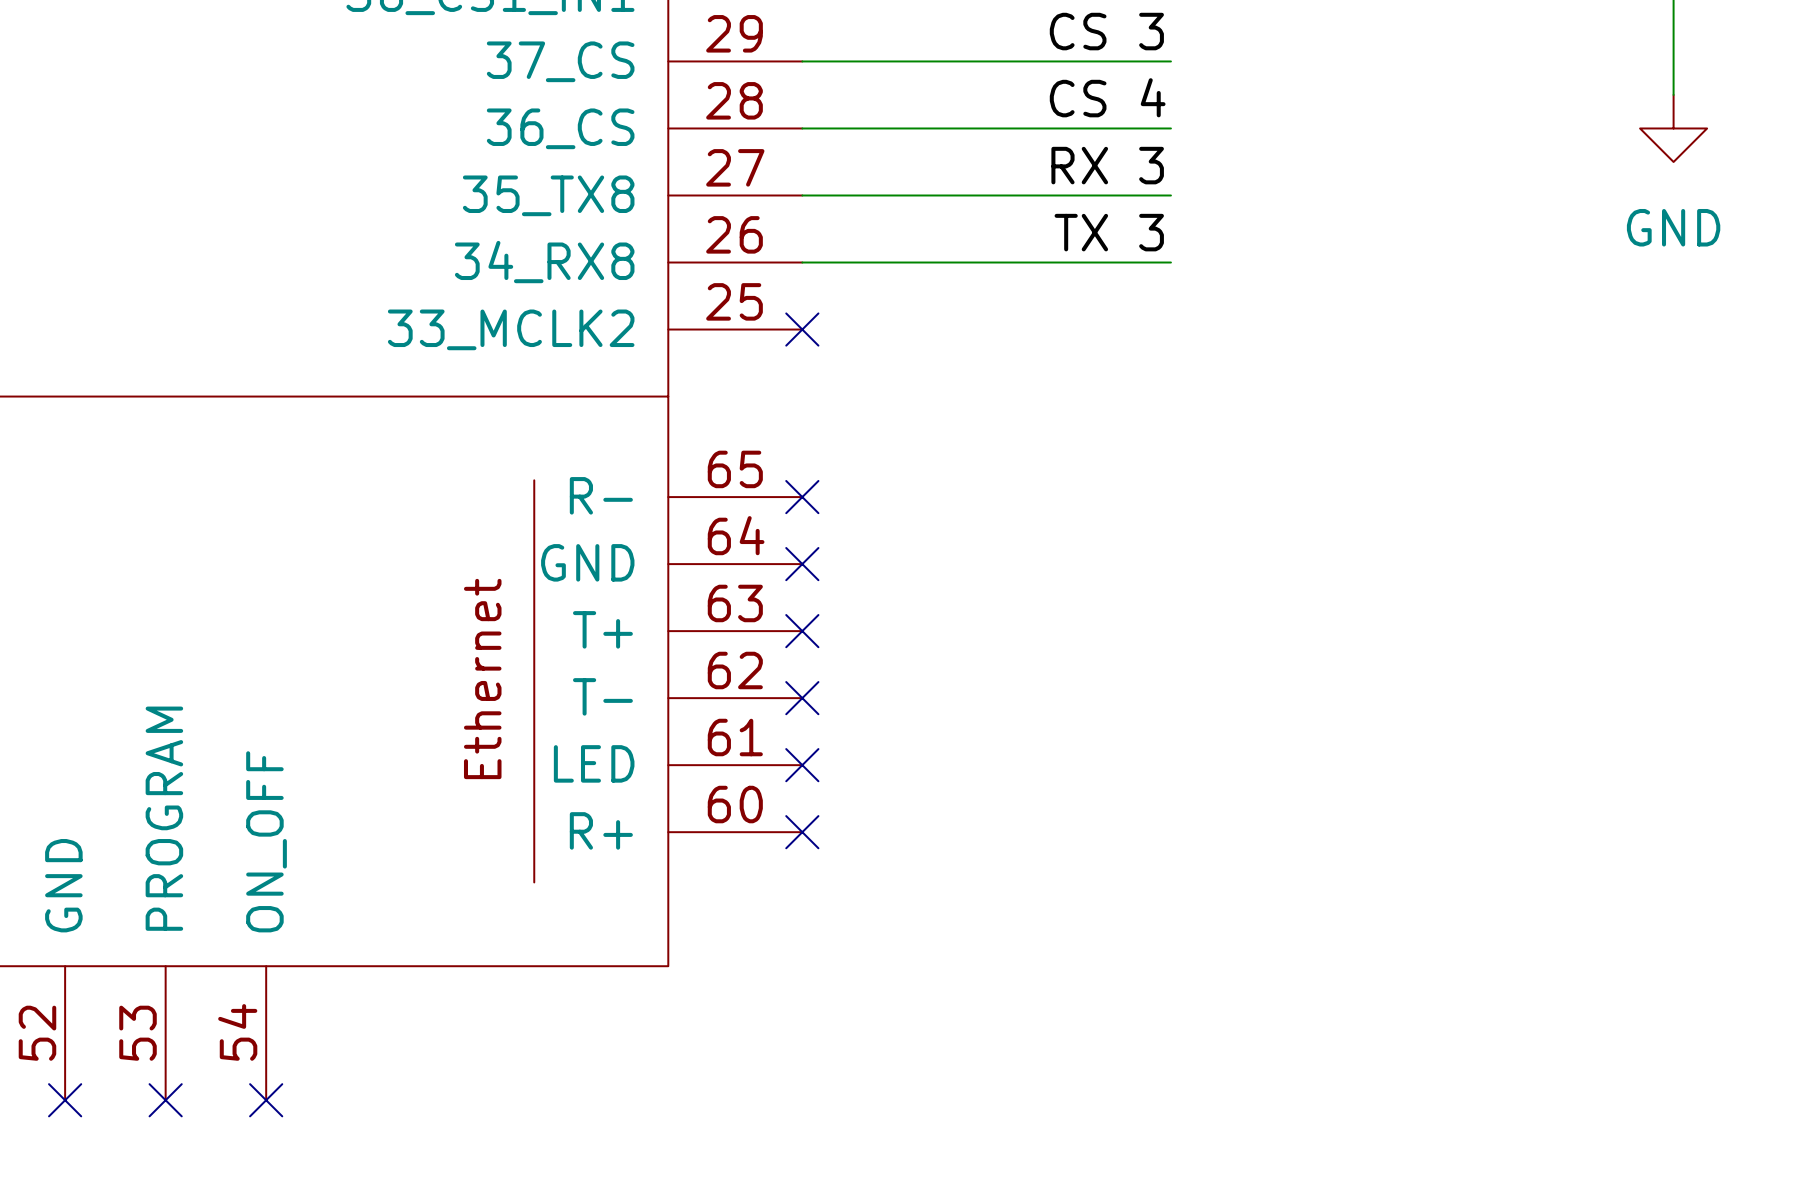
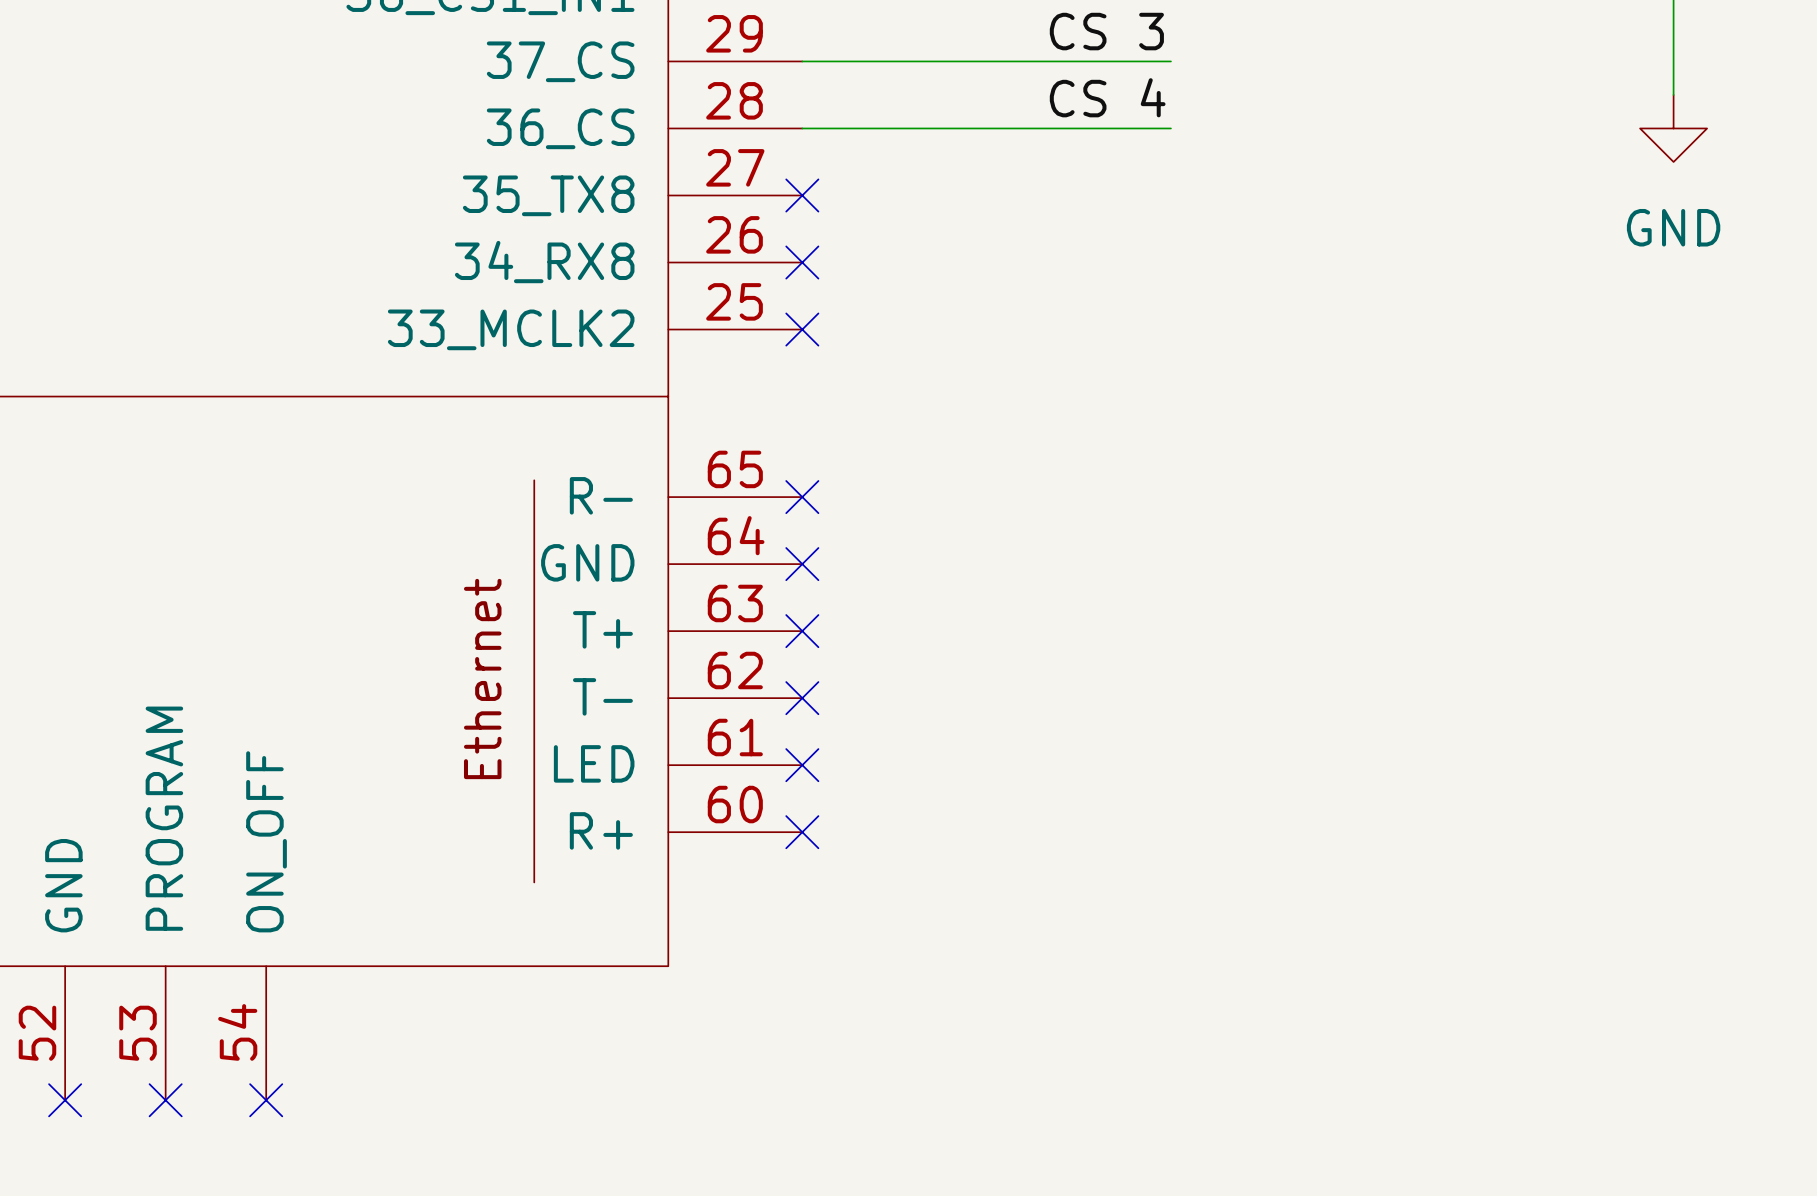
label: RX 3 (1107, 165) -> none
wire: (802, 195) (1170, 195) -> none
no-connect mark: none -> (802, 195)
label: TX 3 (1109, 232) -> none
wire: (802, 262) (1170, 262) -> none
no-connect mark: none -> (802, 262)

